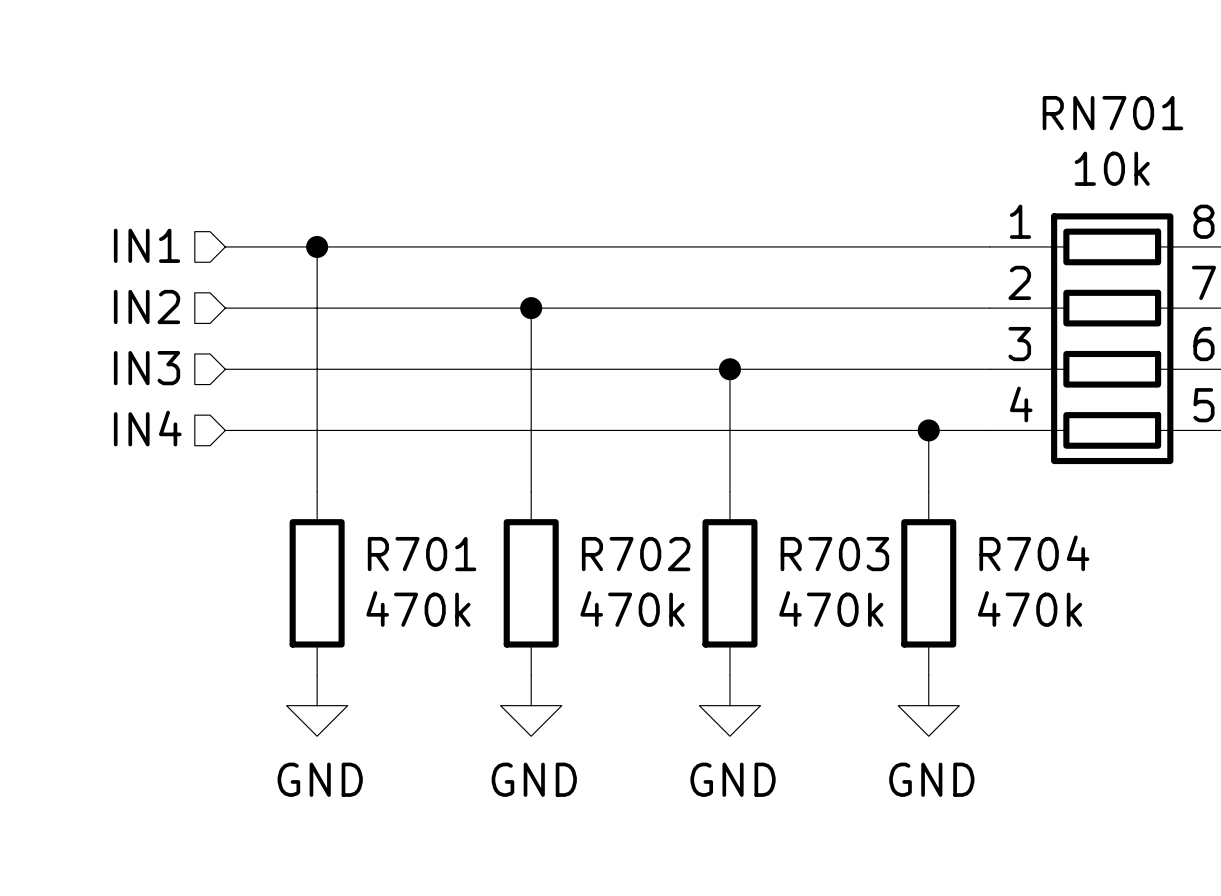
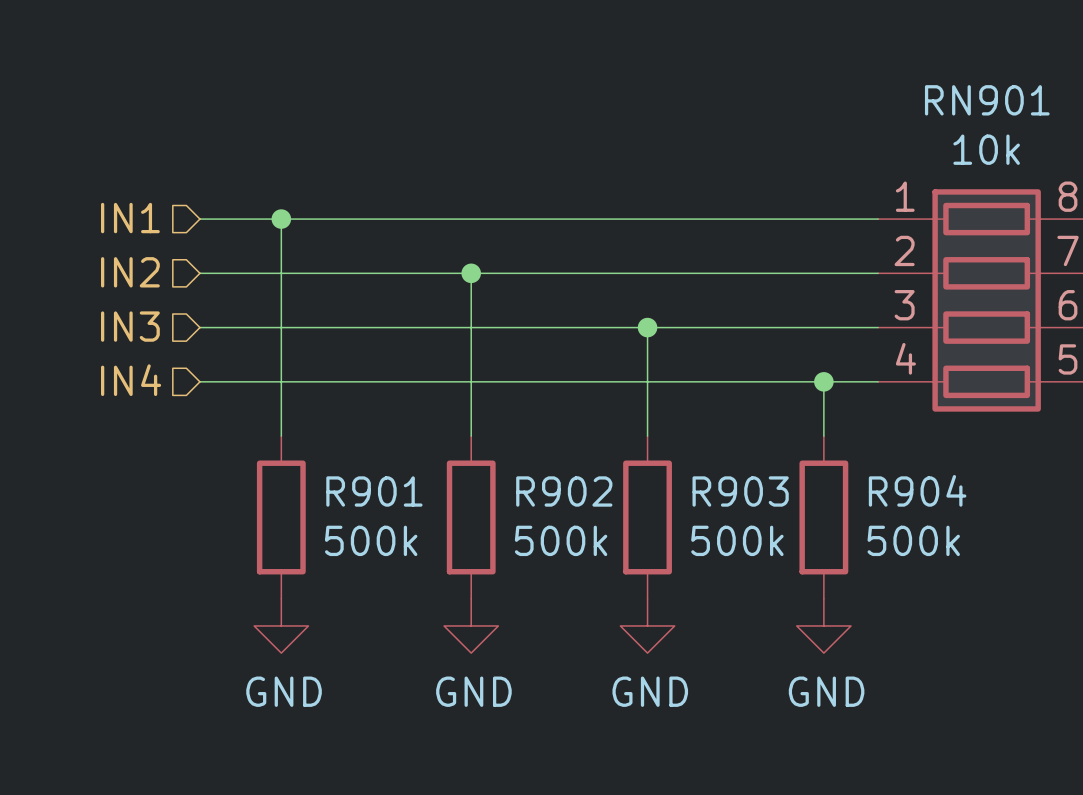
RN701 name: RN701 (1112, 113) -> RN901 (987, 100)
R704 name: R704 (1034, 553) -> R904 (917, 490)
R701 name: R701 (422, 554) -> R901 (374, 491)
R702 name: R702 (636, 554) -> R902 (564, 491)
R703 name: R703 (834, 554) -> R903 (740, 491)
R701 value: 470k (418, 608) -> 500k (371, 540)
R702 value: 470k (632, 608) -> 500k (561, 540)
R703 value: 470k (831, 608) -> 500k (737, 540)
R704 value: 470k (1030, 608) -> 500k (913, 540)

